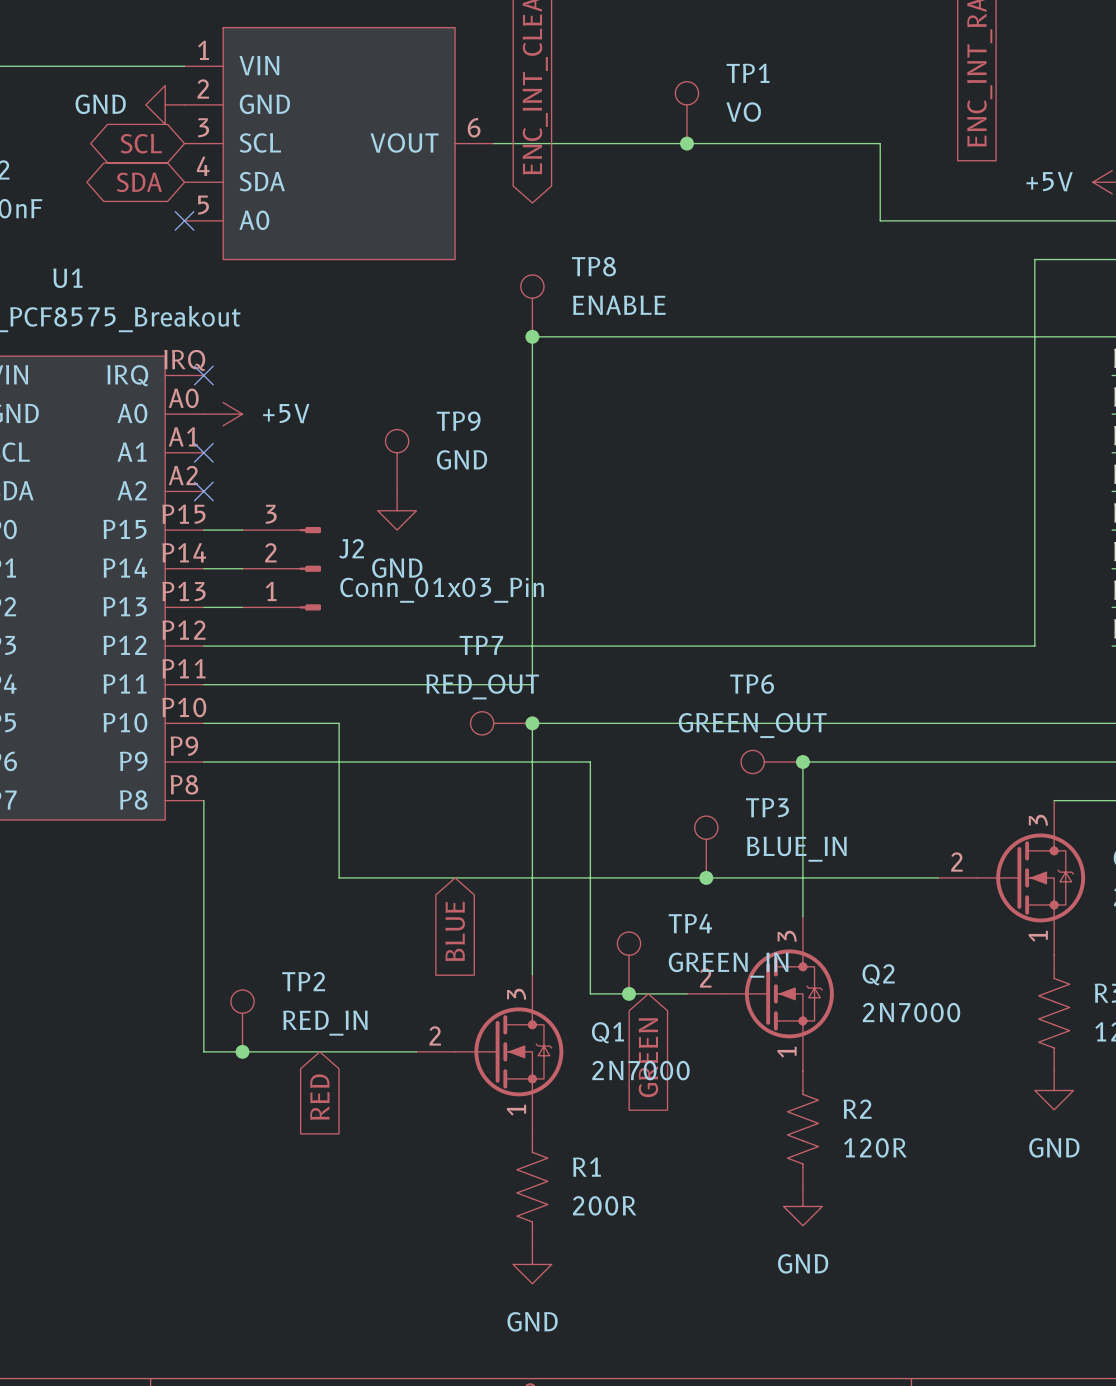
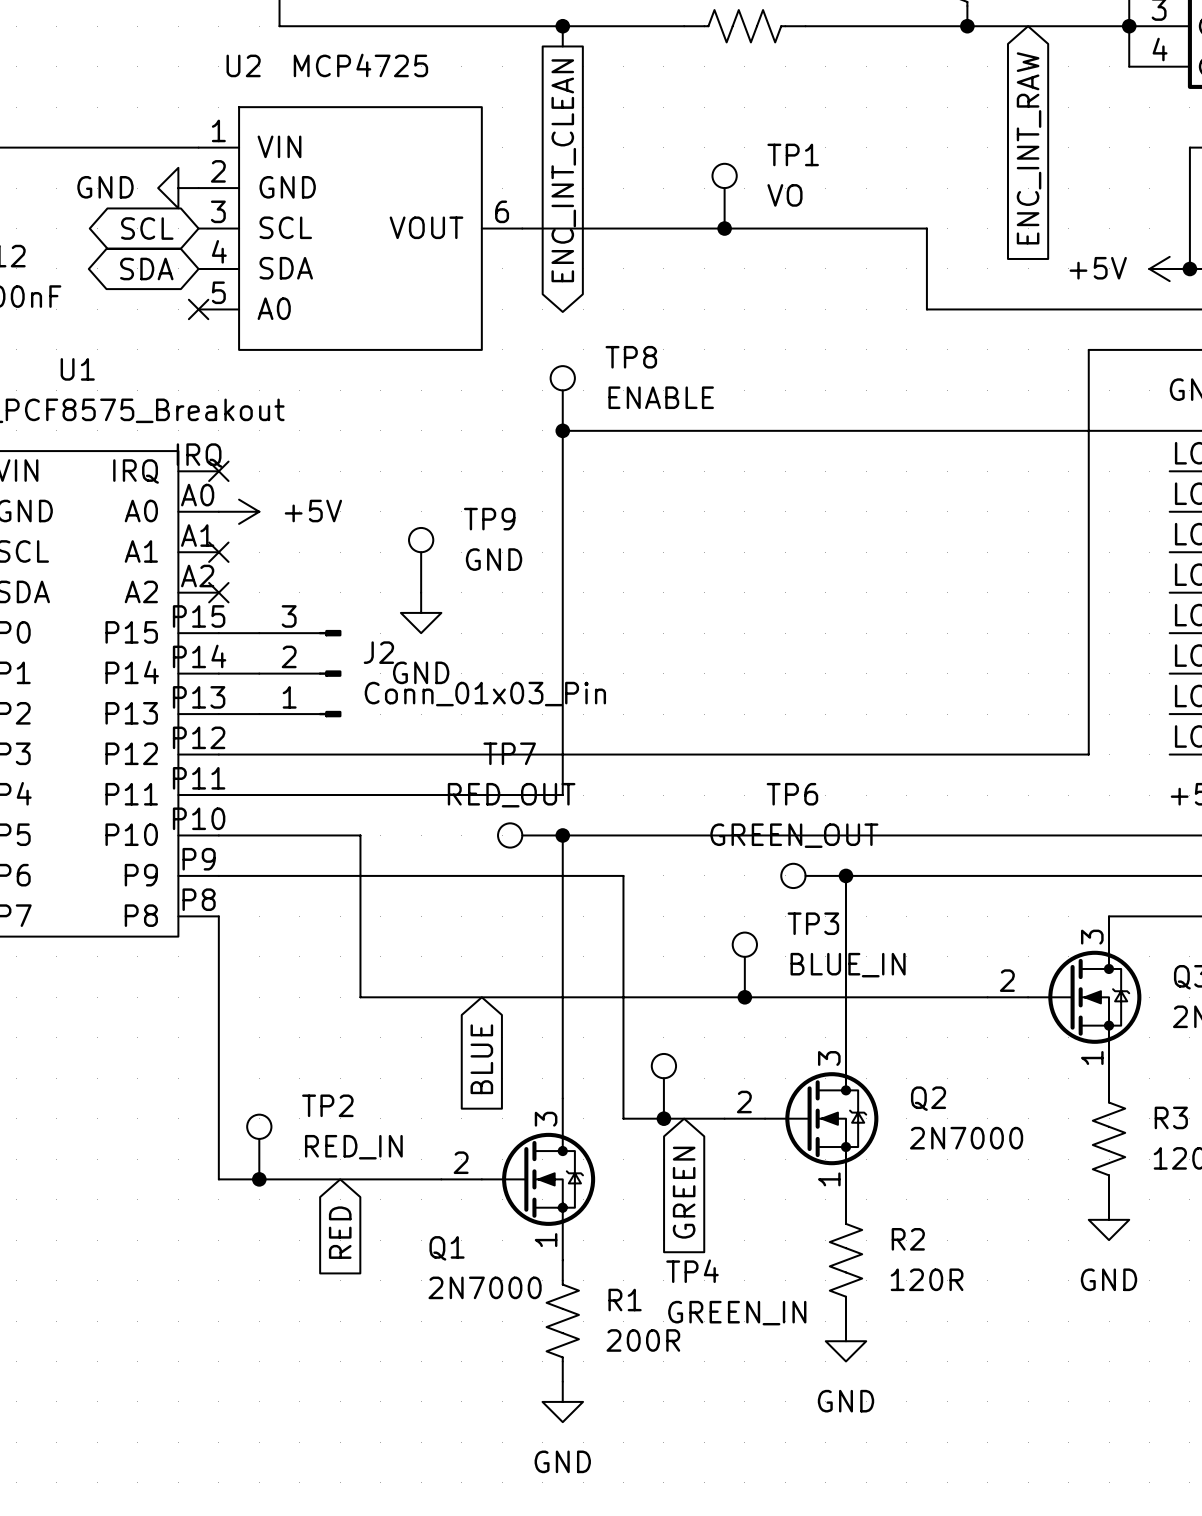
TP4 name position: TP4 (690, 923) -> TP4 (692, 1271)
TP4 value position: GREEN_IN (728, 965) -> GREEN_IN (737, 1313)
Q1 name position: Q1 (608, 1032) -> Q1 (447, 1248)
Q1 value position: 2N7000 (640, 1070) -> 2N7000 (485, 1287)

